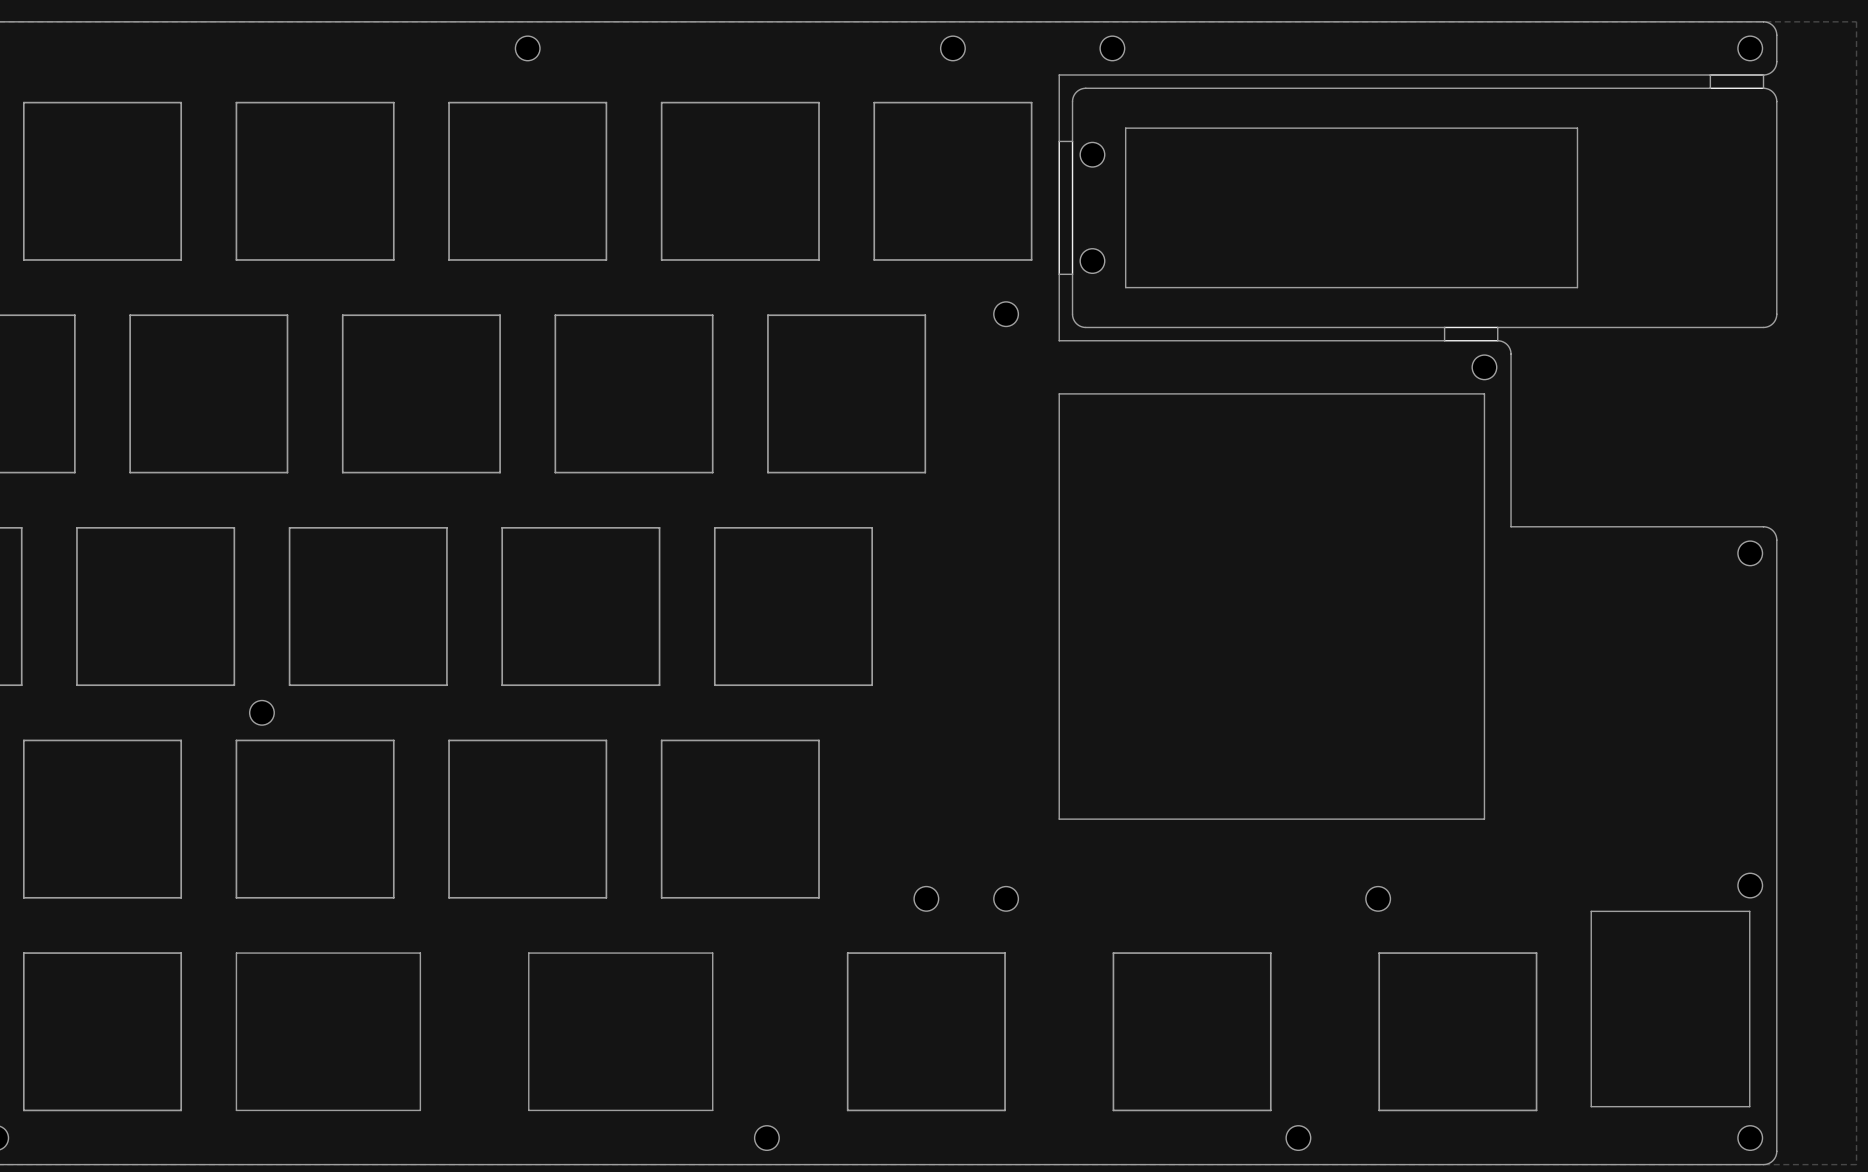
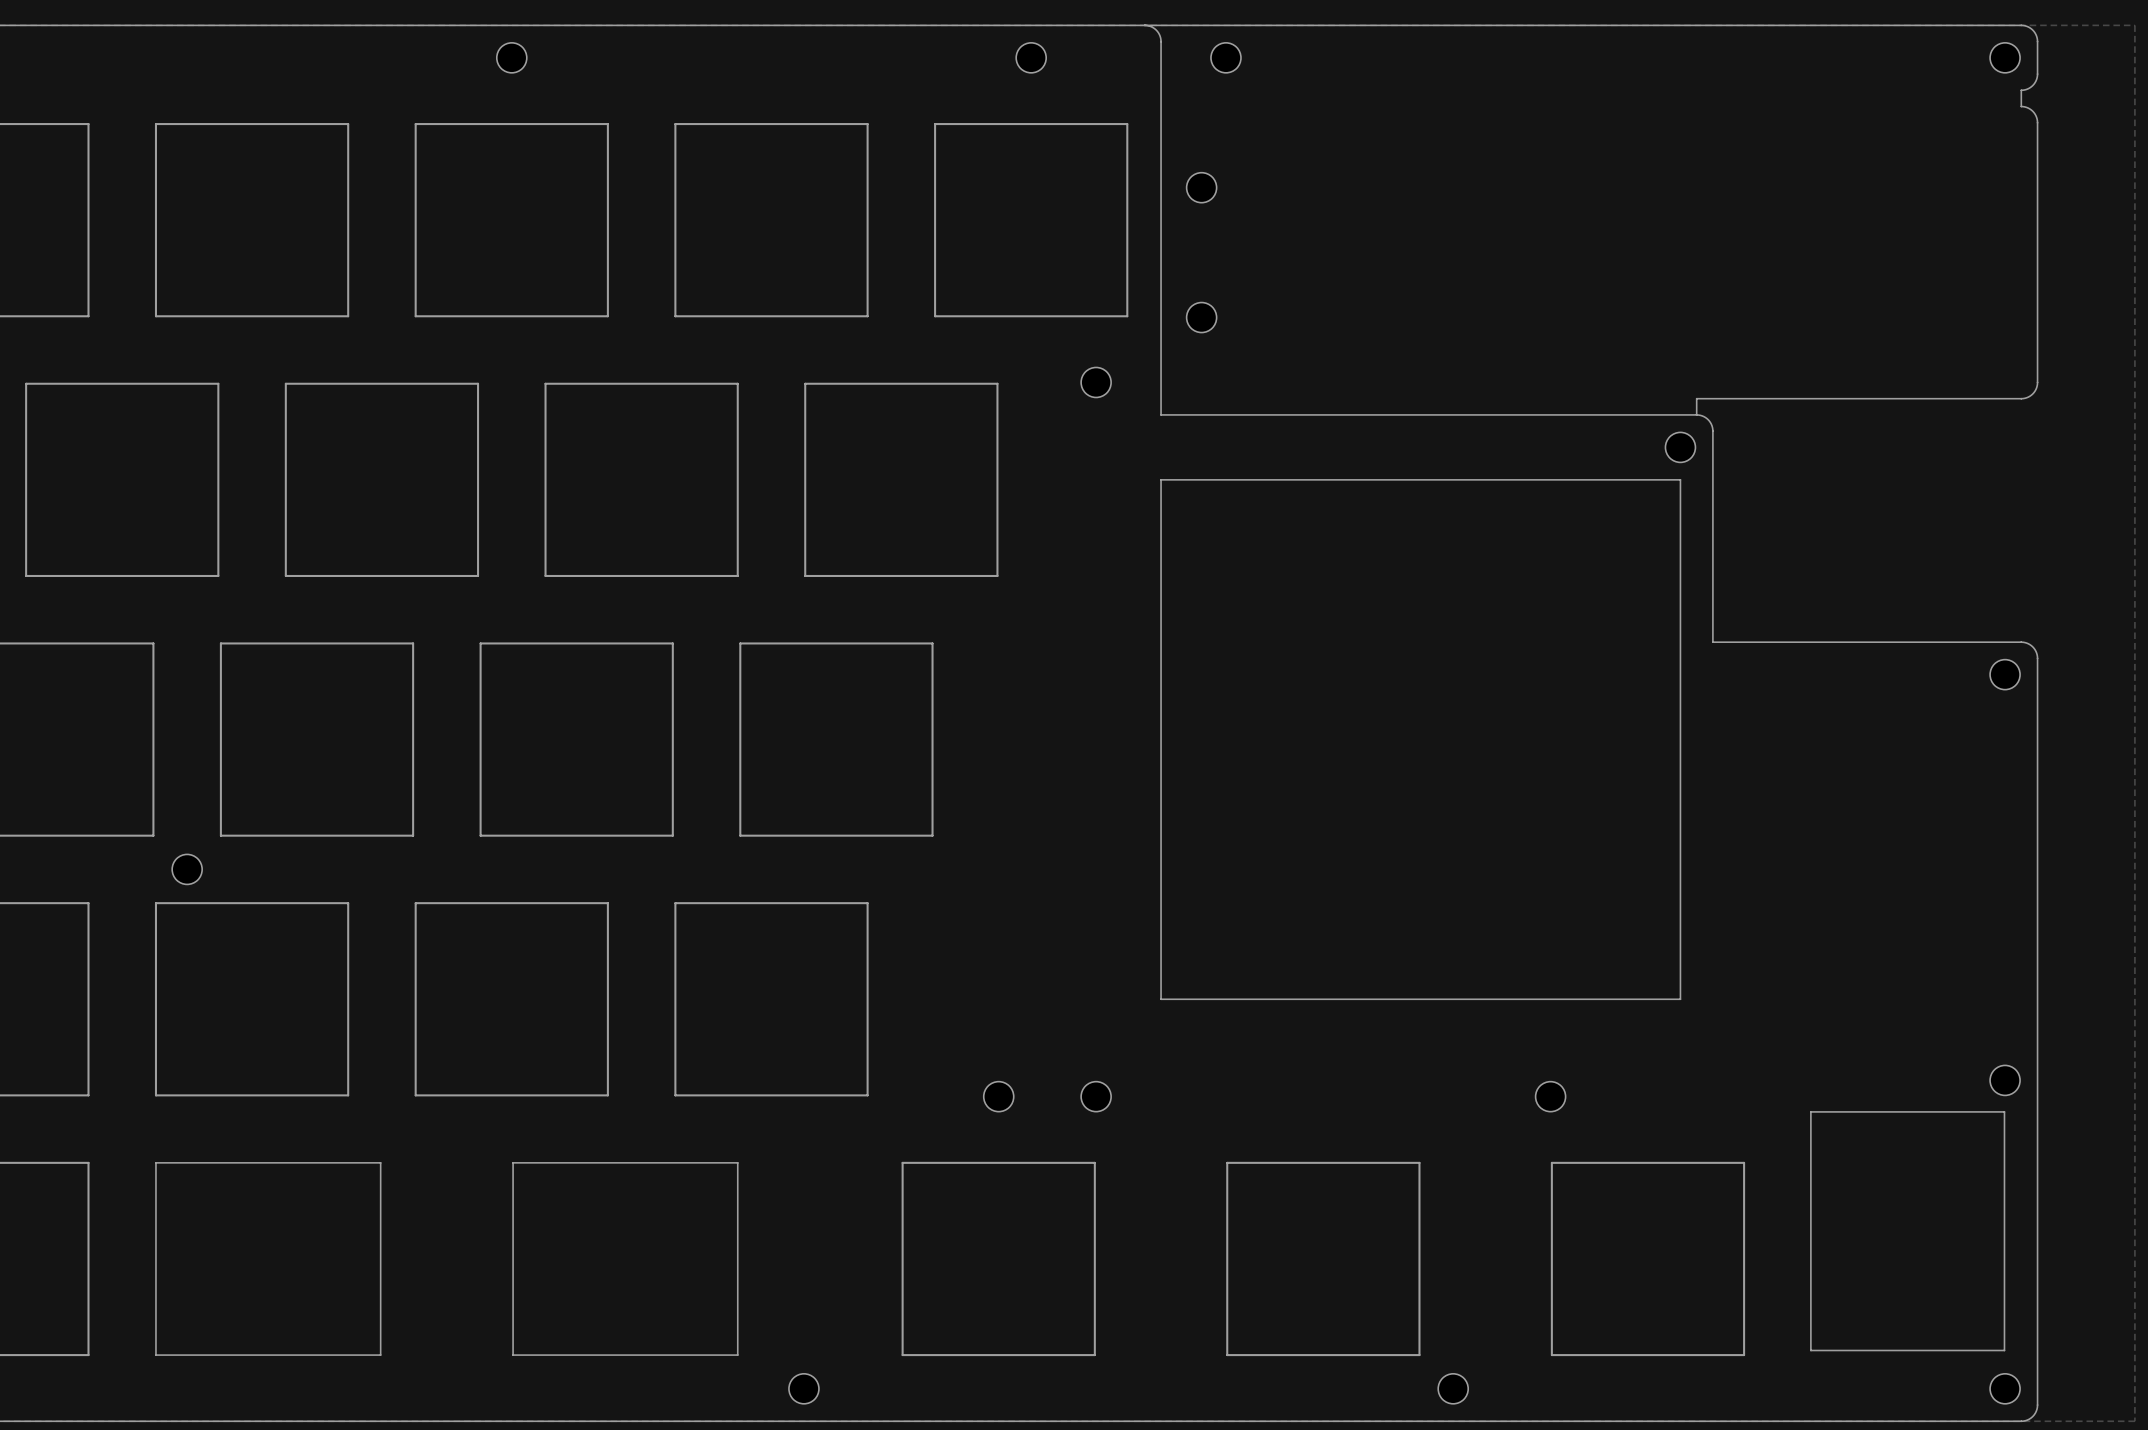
board edge: (1059, 74) (1710, 74) (1710, 88) (1084, 88) (1076, 92) (1072, 98) (1072, 141) (1059, 141) -> (1161, 90) (1160, 38) (1154, 28) (1144, 25)
line: (1763, 74) (1710, 74) -> none
line: (1763, 88) (1710, 88) -> none
board edge: (1577, 128) (1125, 128) (1125, 287) (1577, 287) (1577, 128) -> none
line: (1059, 141) (1059, 274) -> none
line: (1072, 141) (1072, 274) -> none
board edge: (1059, 274) (1072, 274) (1072, 317) (1076, 323) (1082, 327) (1444, 327) (1444, 340) -> (1161, 333) (1161, 171)
line: (1497, 327) (1444, 327) -> none
line: (1497, 340) (1444, 340) -> none

